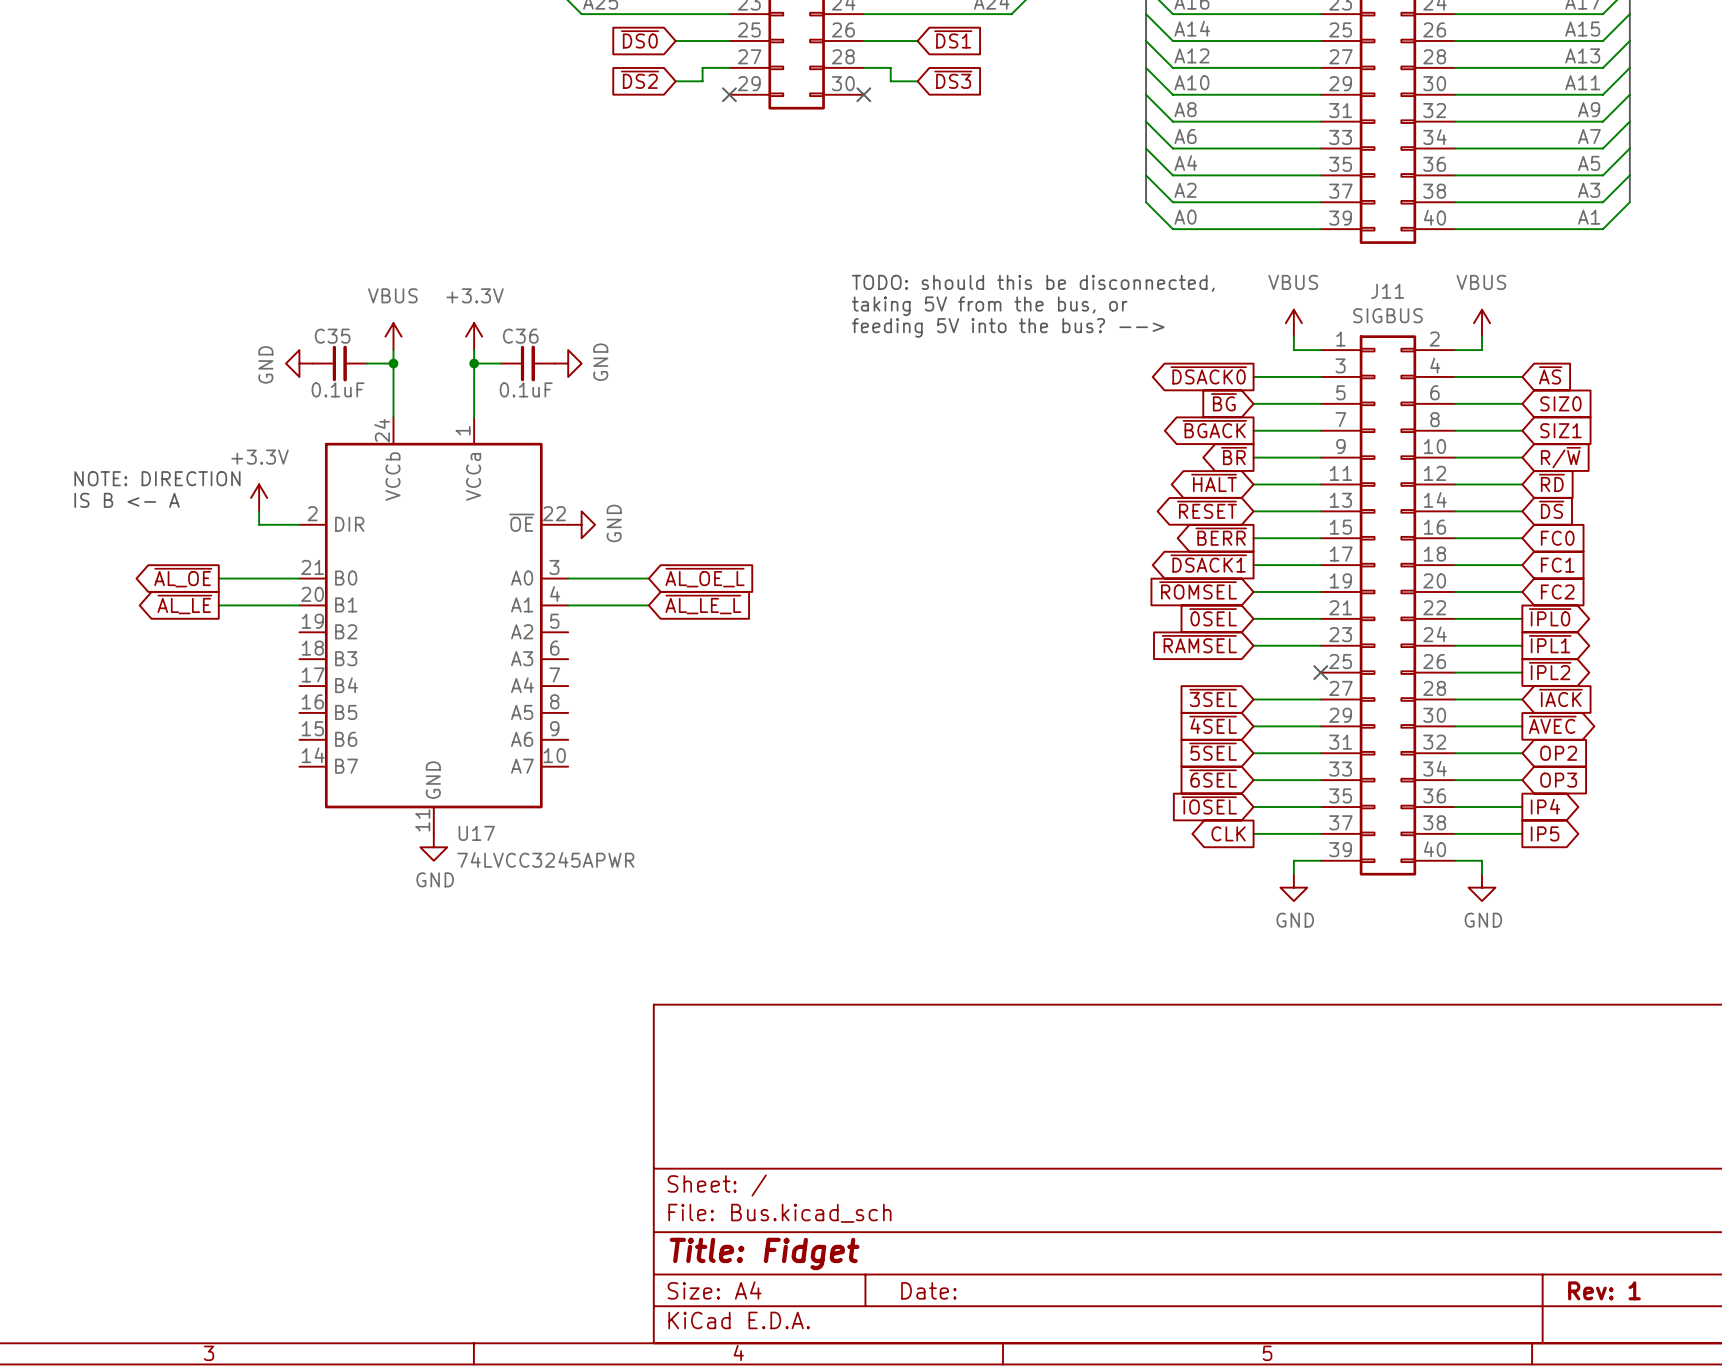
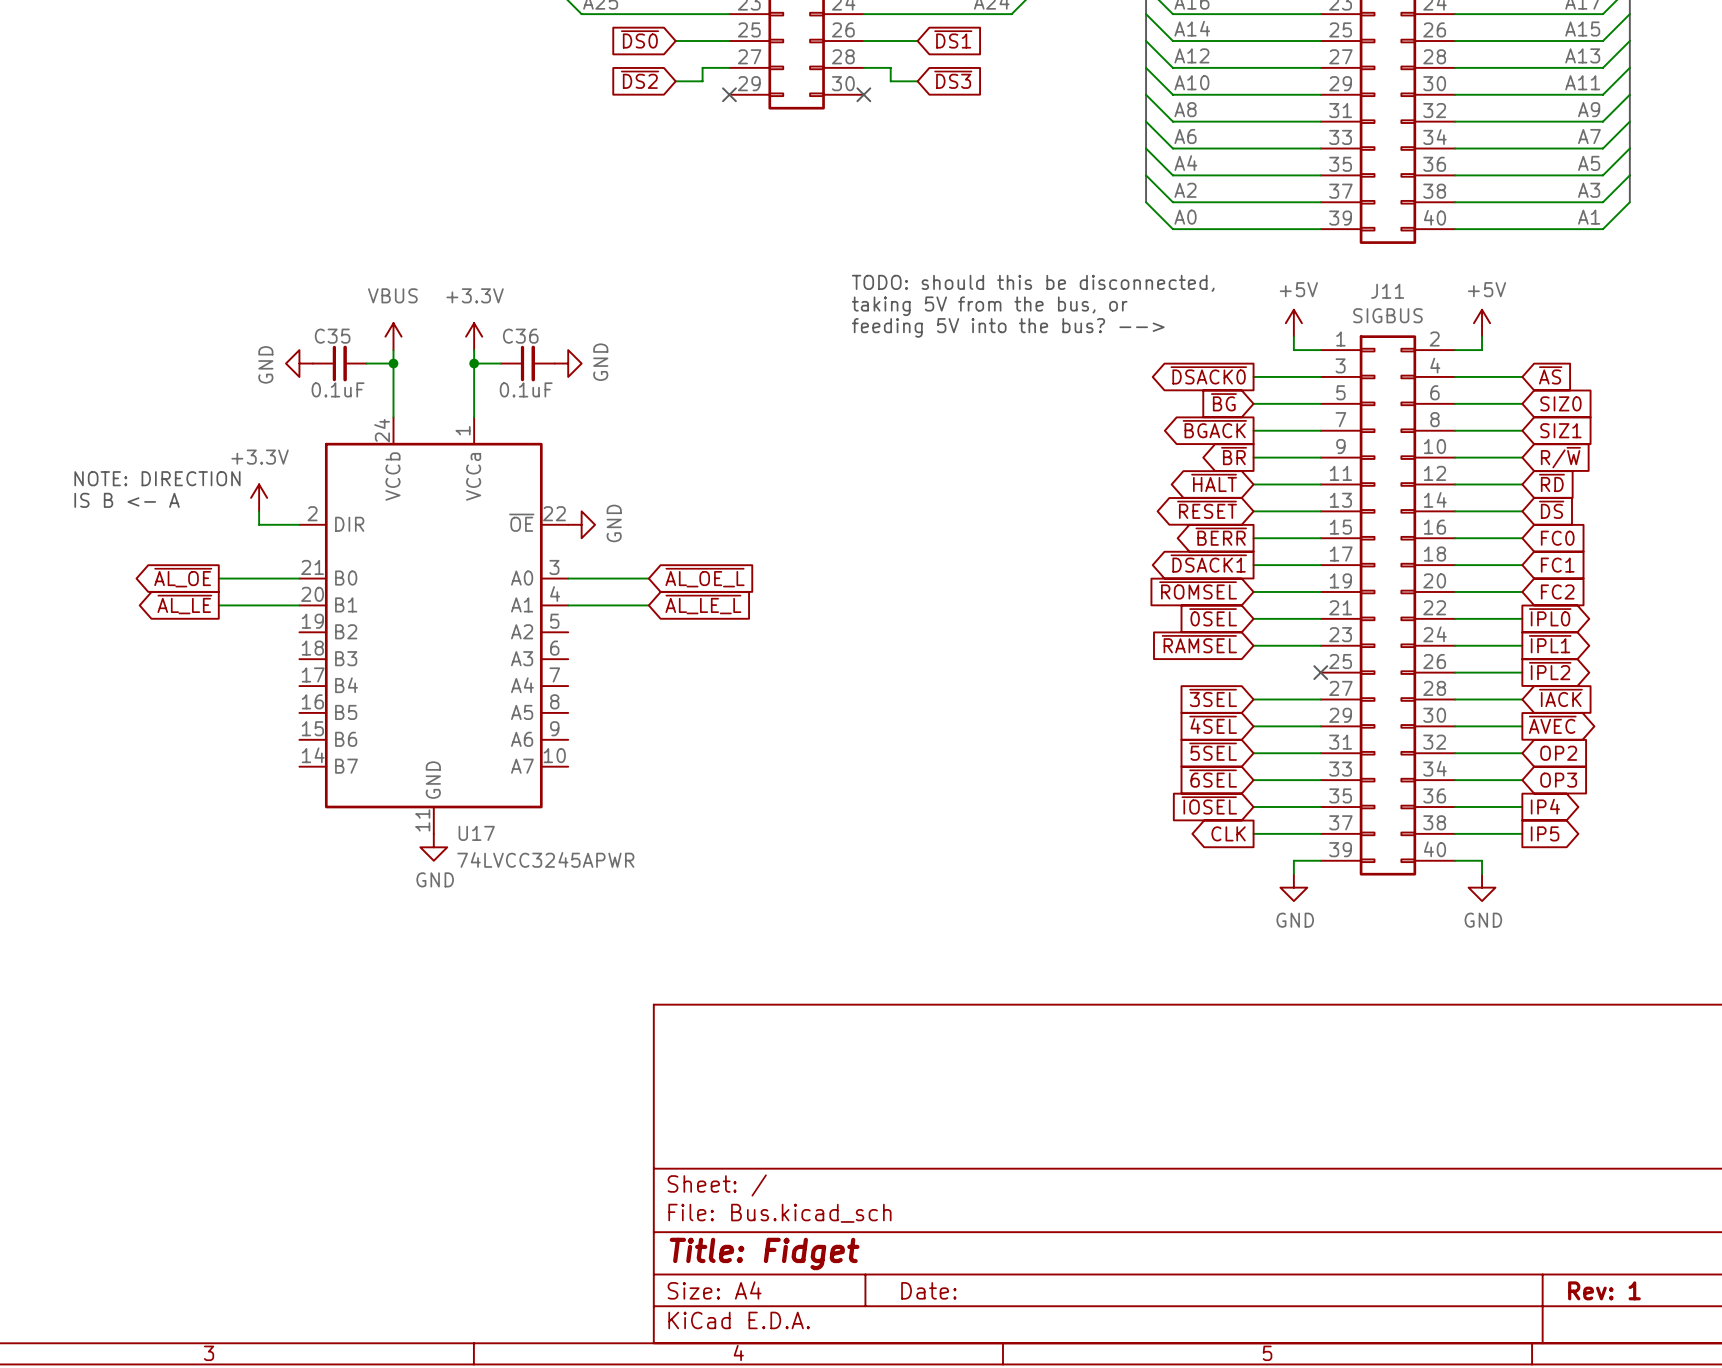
power symbol: VBUS (1293, 323) -> +5V (1293, 323)
power symbol: VBUS (1482, 323) -> +5V (1482, 323)

